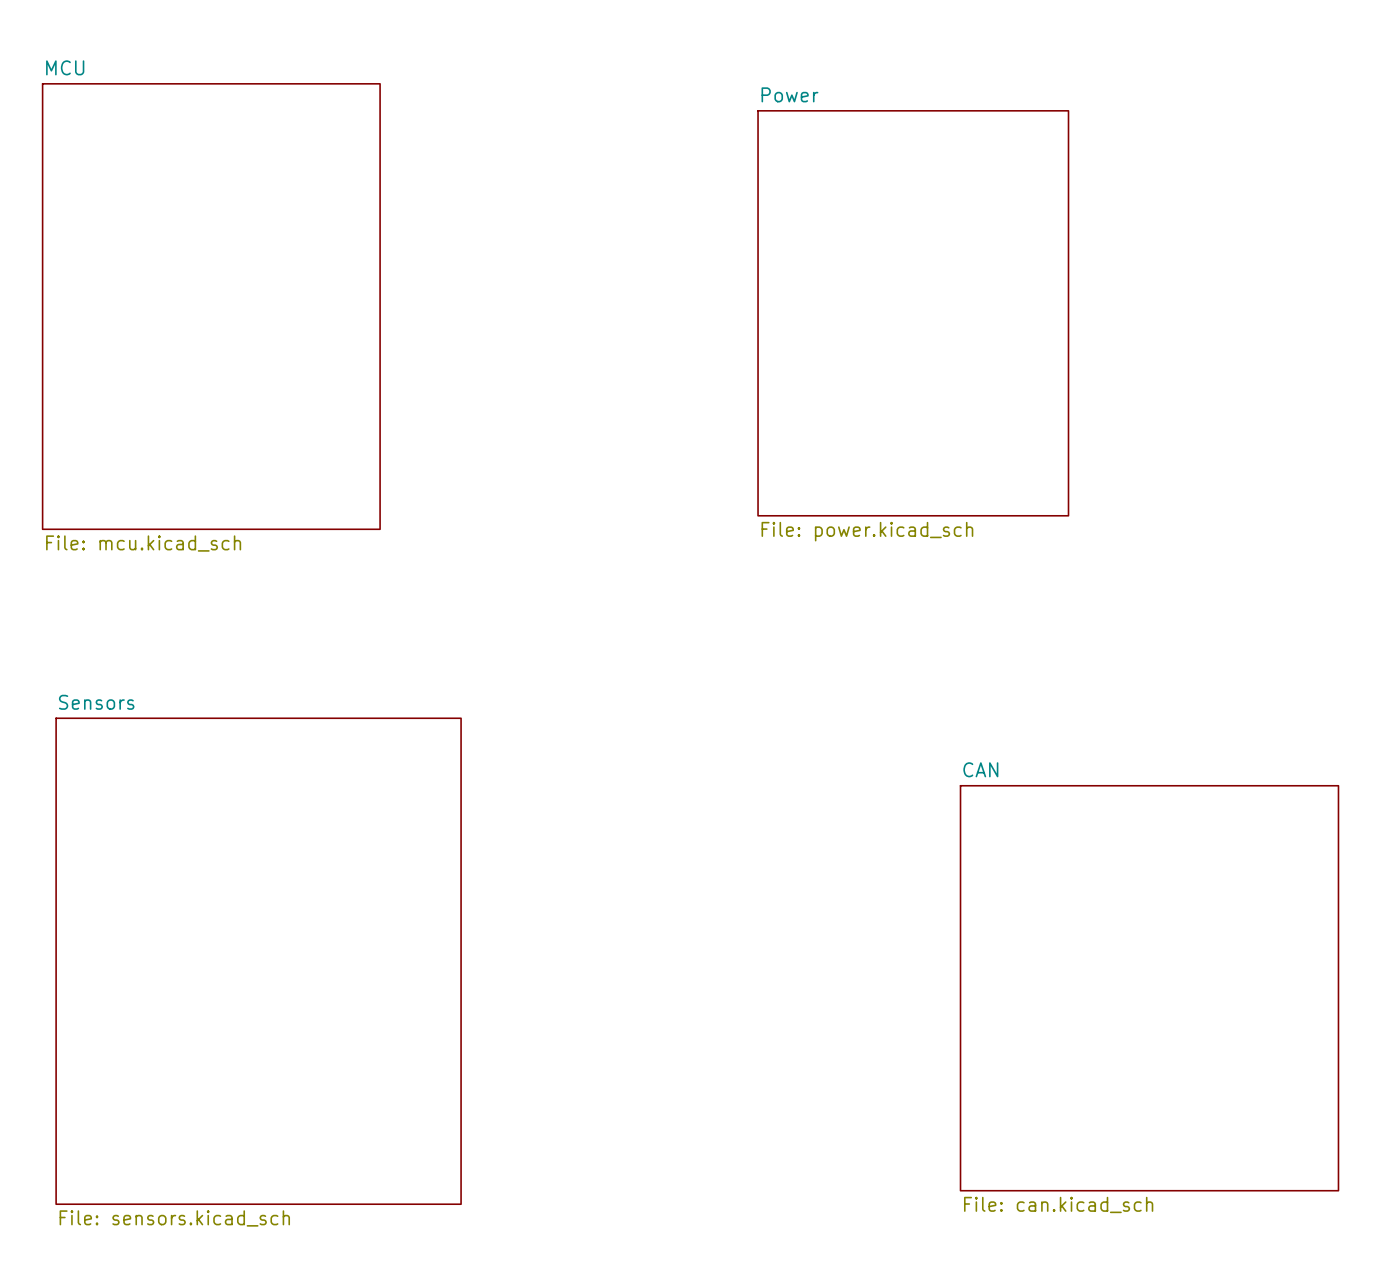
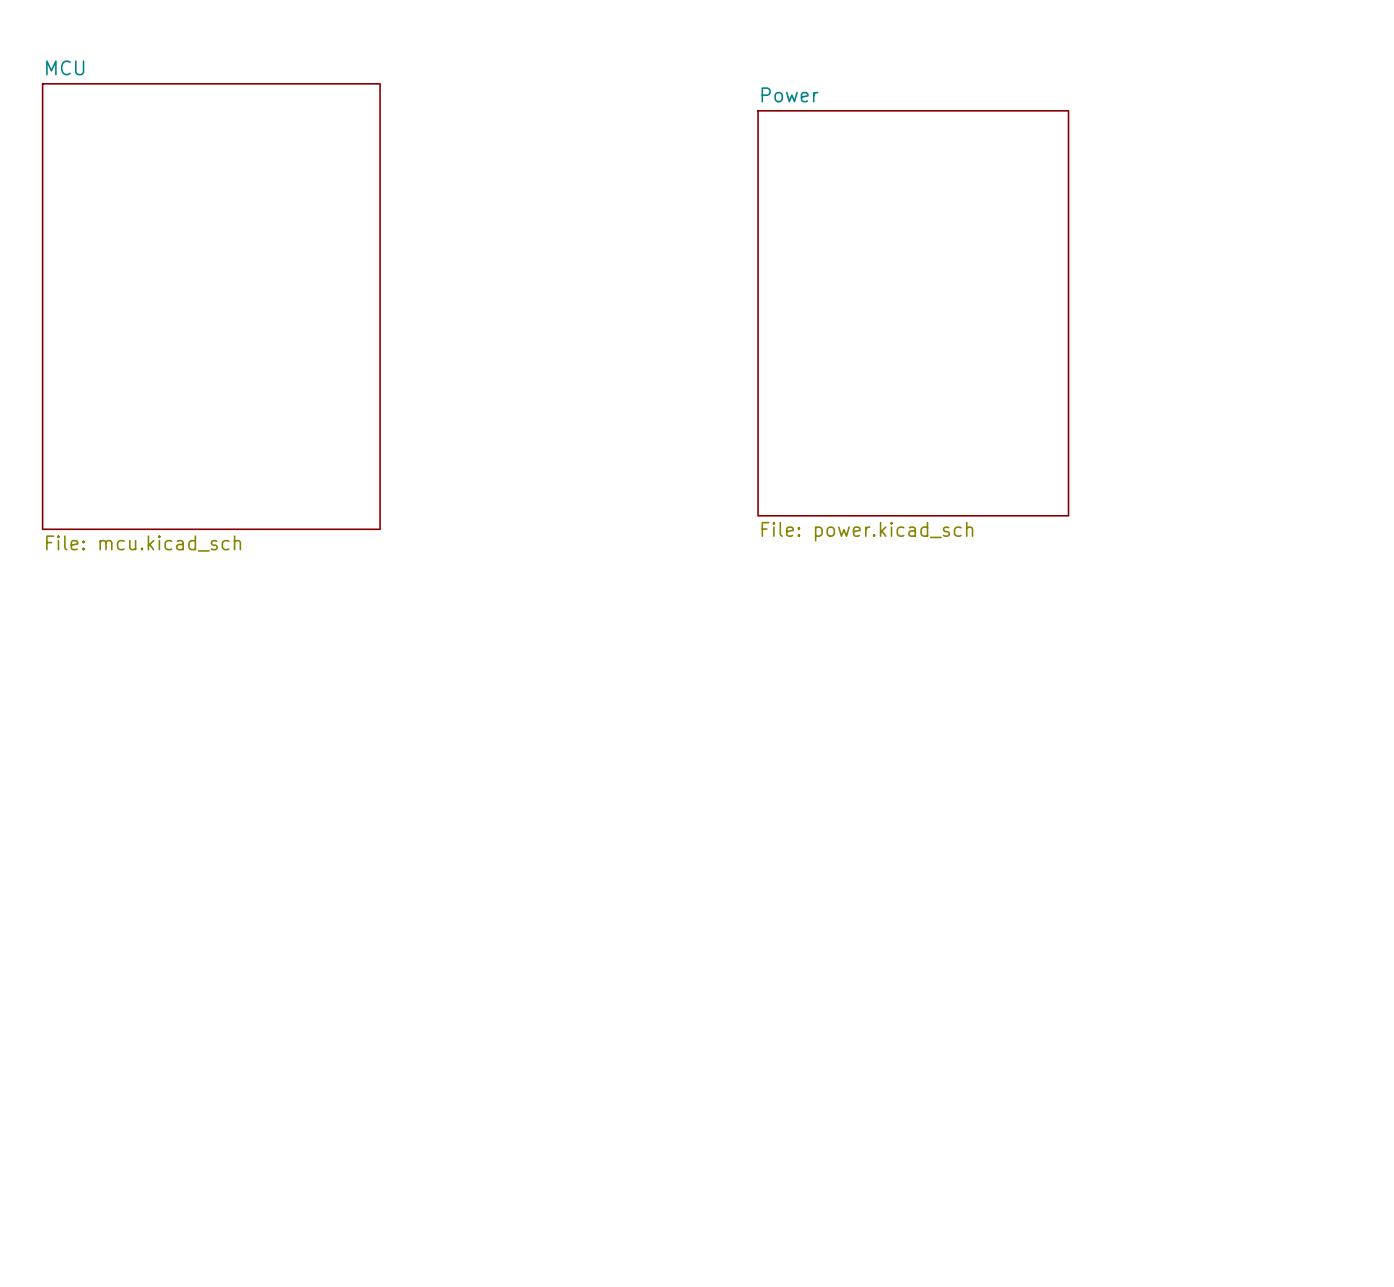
sheet Sensors: File: sensors.kicad_sch (258, 961) -> none
sheet CAN: File: can.kicad_sch (1149, 988) -> none

